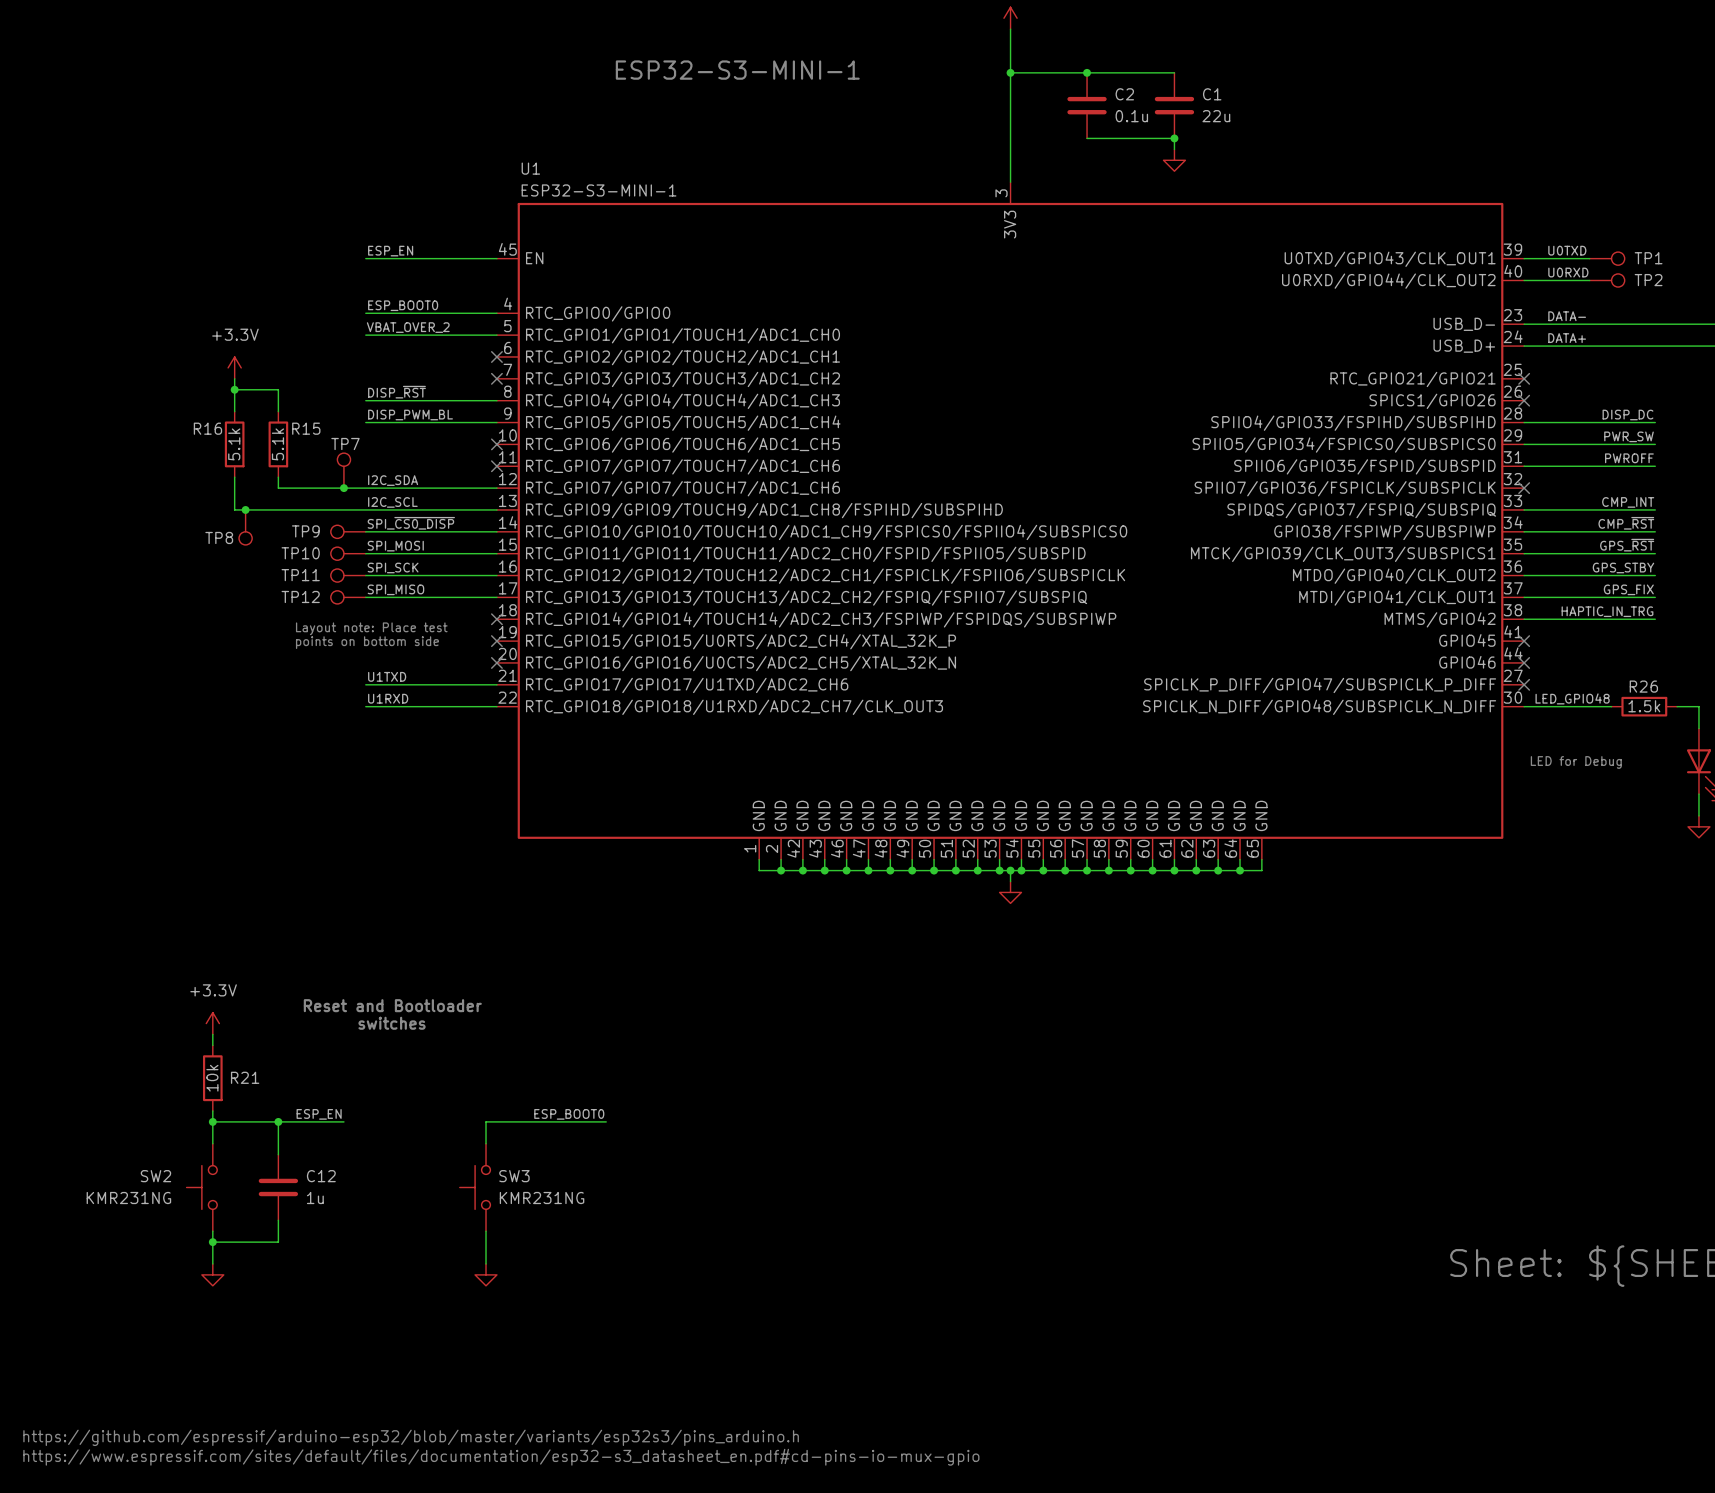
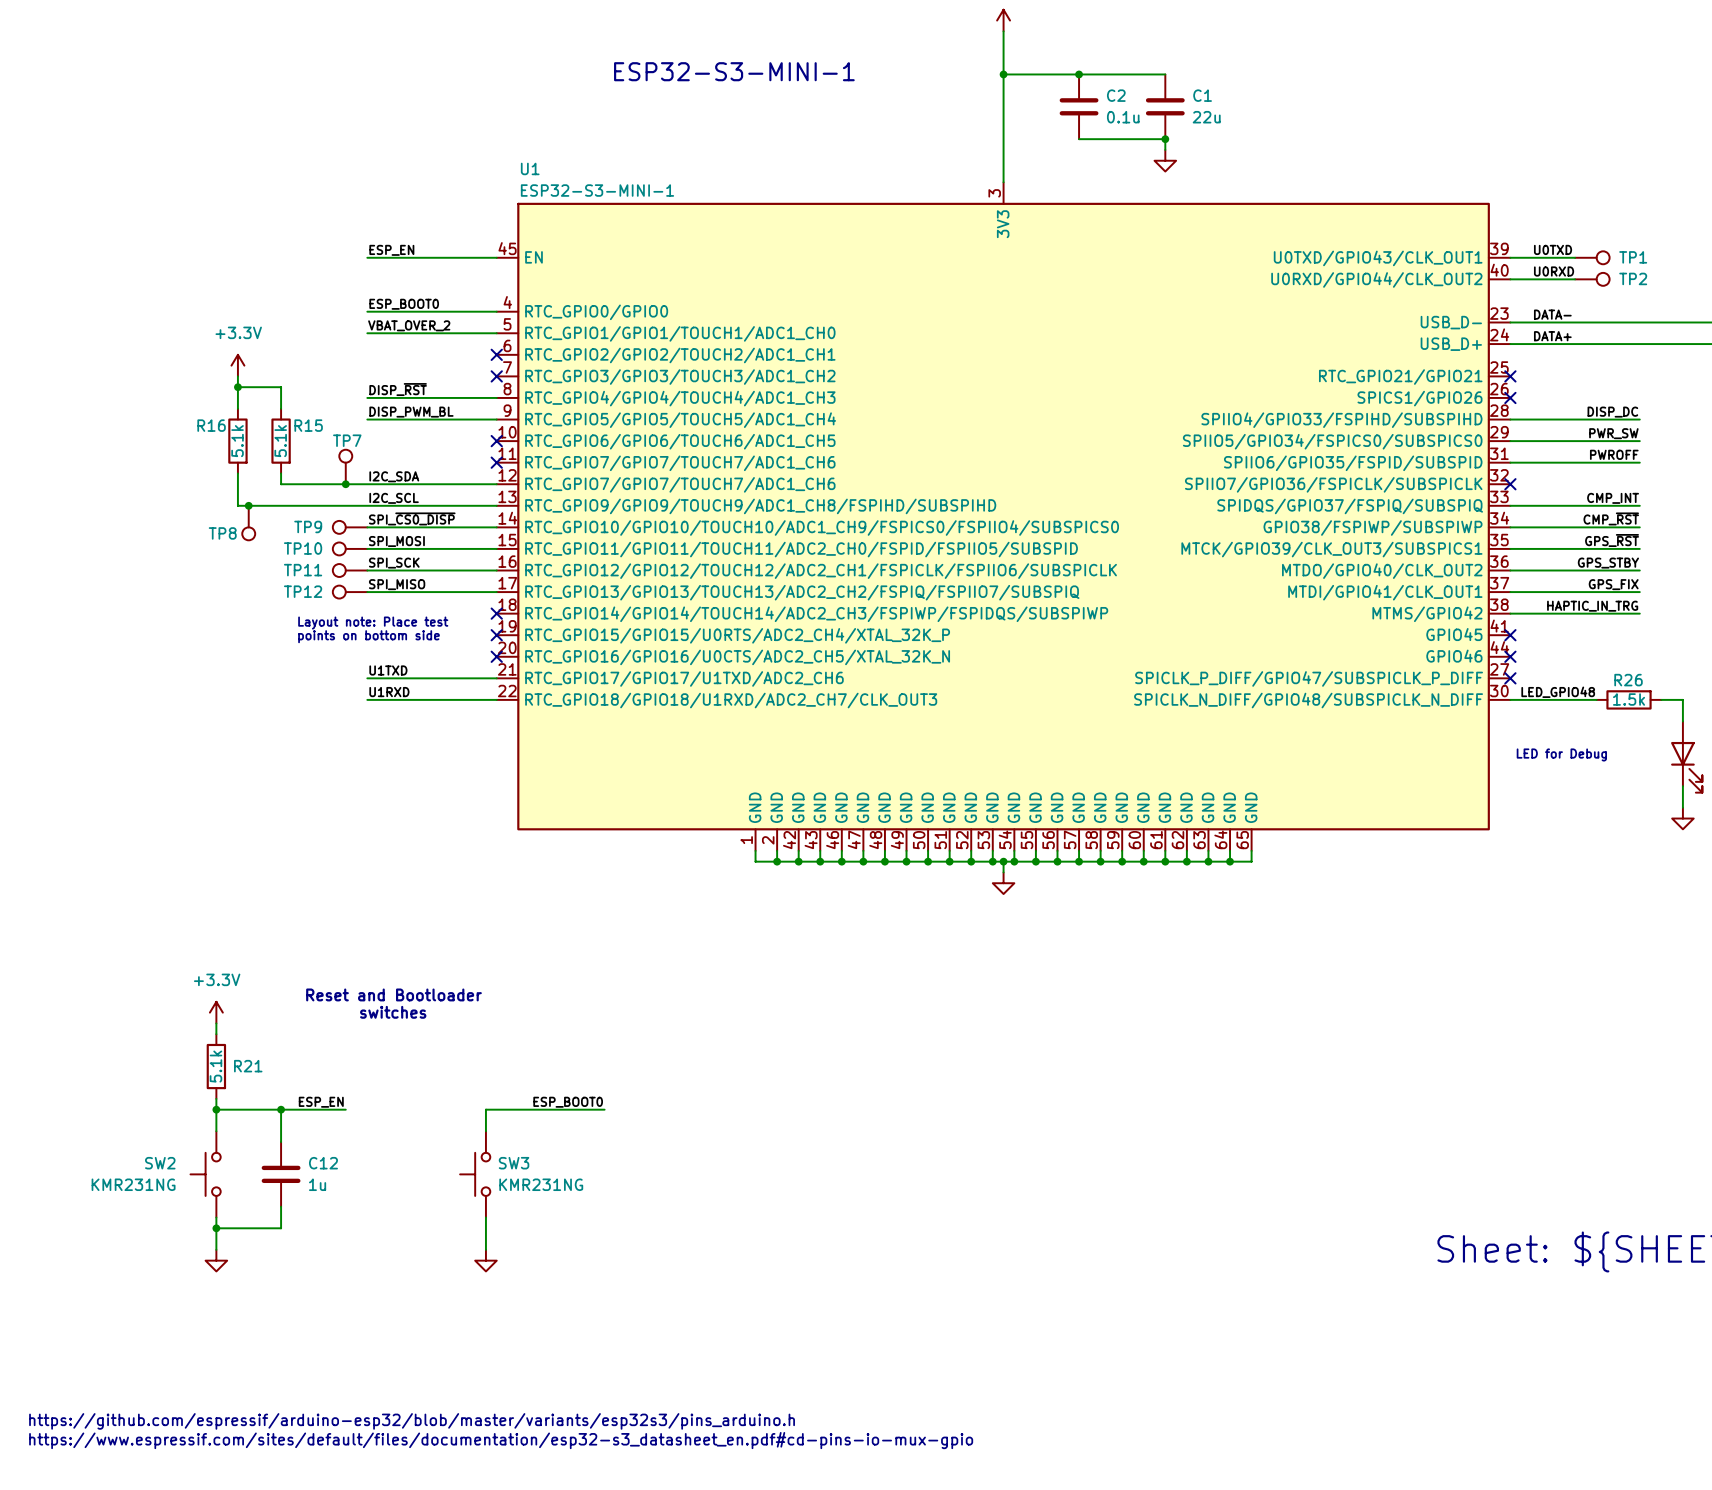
R21 value: 10k (212, 1078) -> 5.1k (215, 1066)

